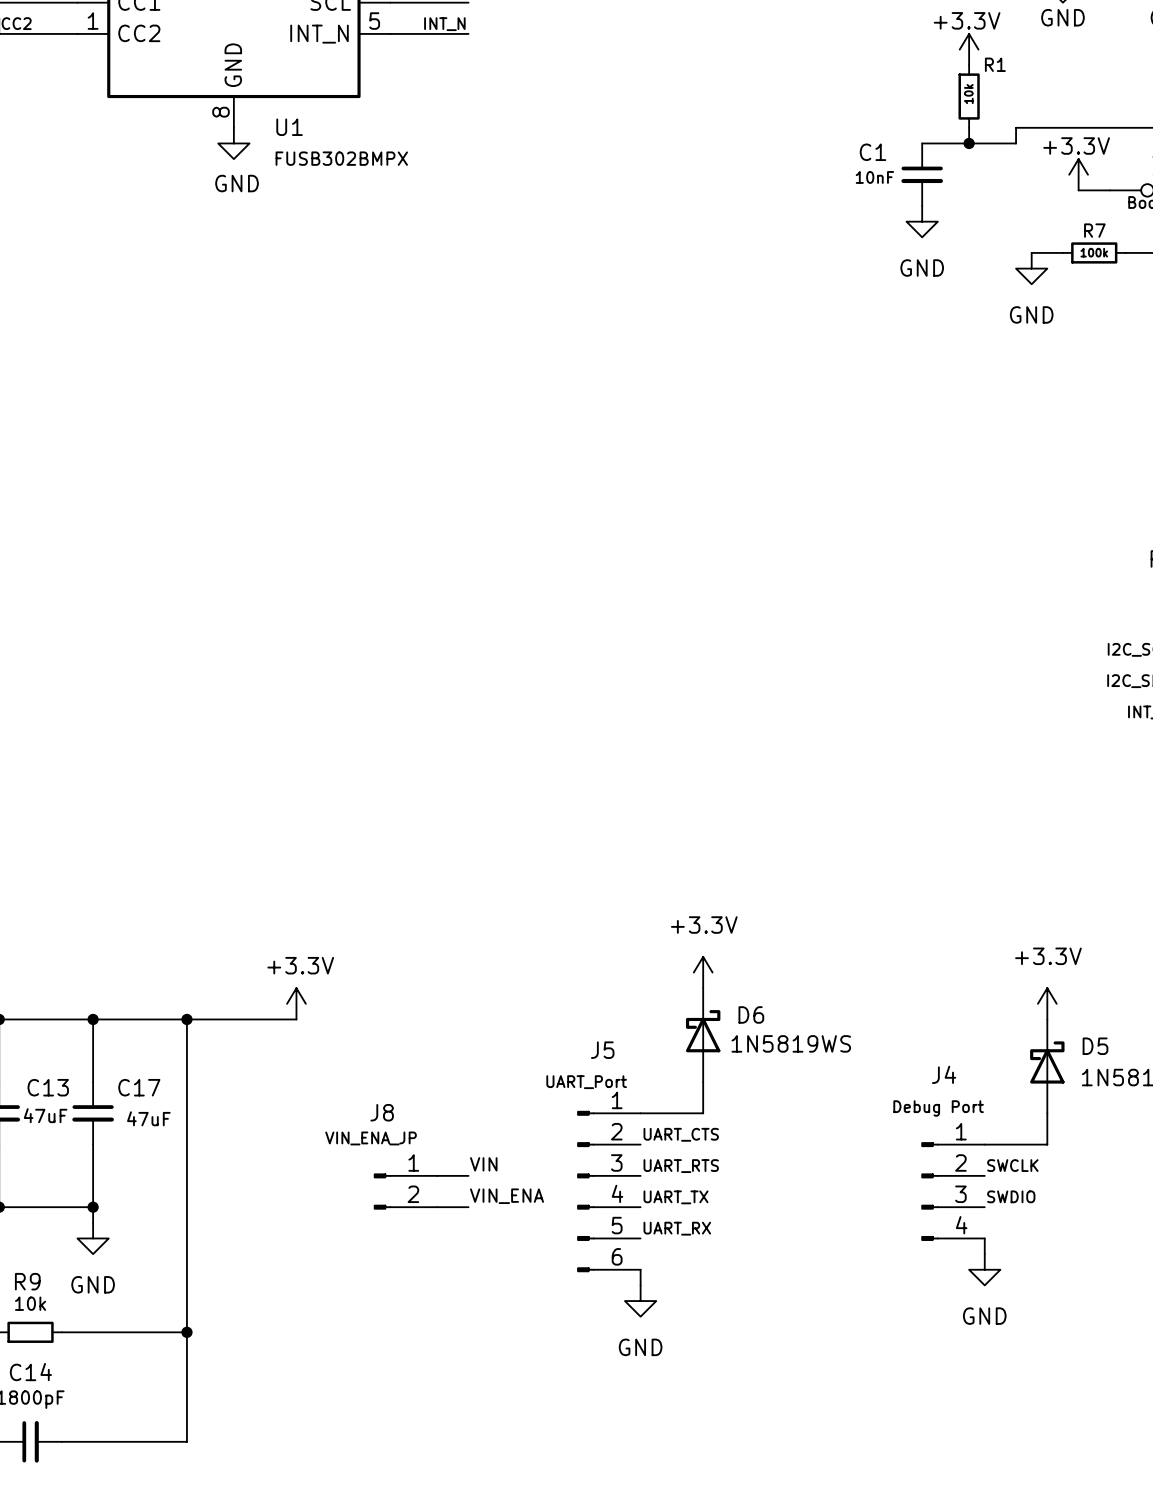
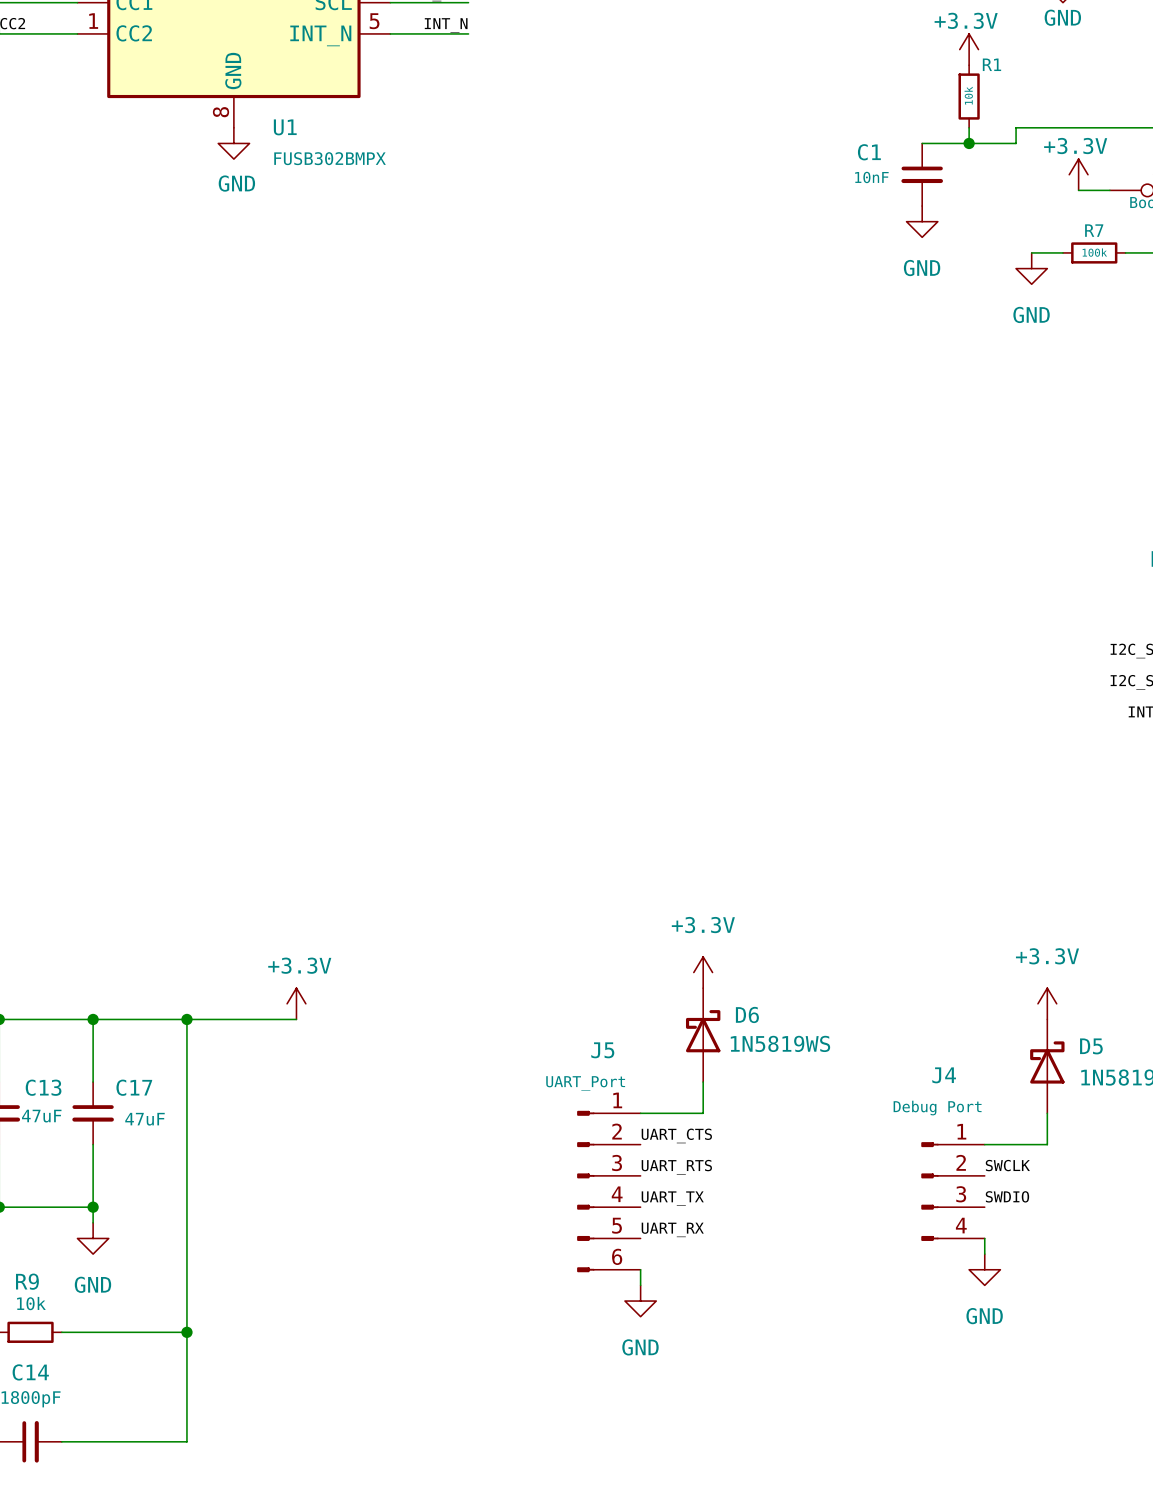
label: VIN (483, 1164) -> none
wire: (437, 1175) (468, 1175) -> none
J8: VIN_ENA_JP (405, 1191) -> none
label: VIN_ENA (507, 1196) -> none
wire: (437, 1207) (468, 1207) -> none

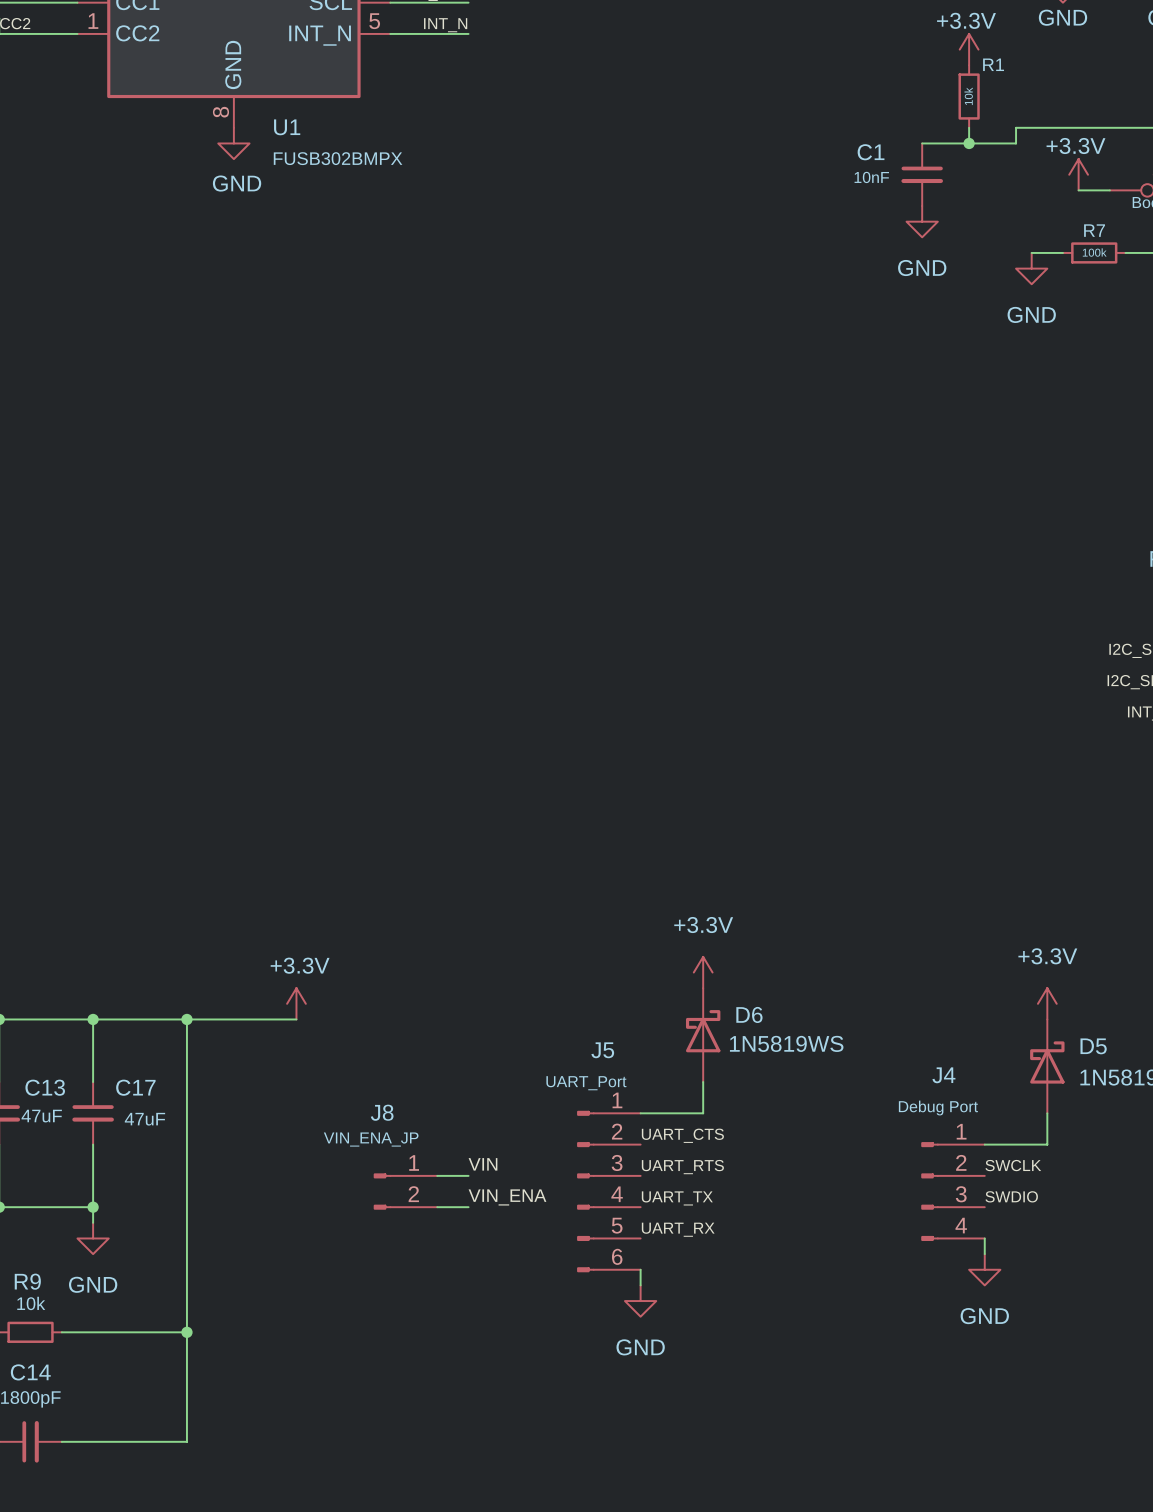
label: none -> VIN (483, 1164)
wire: none -> (437, 1175) (468, 1175)
J8: none -> VIN_ENA_JP (405, 1191)
label: none -> VIN_ENA (507, 1197)
wire: none -> (437, 1207) (468, 1207)

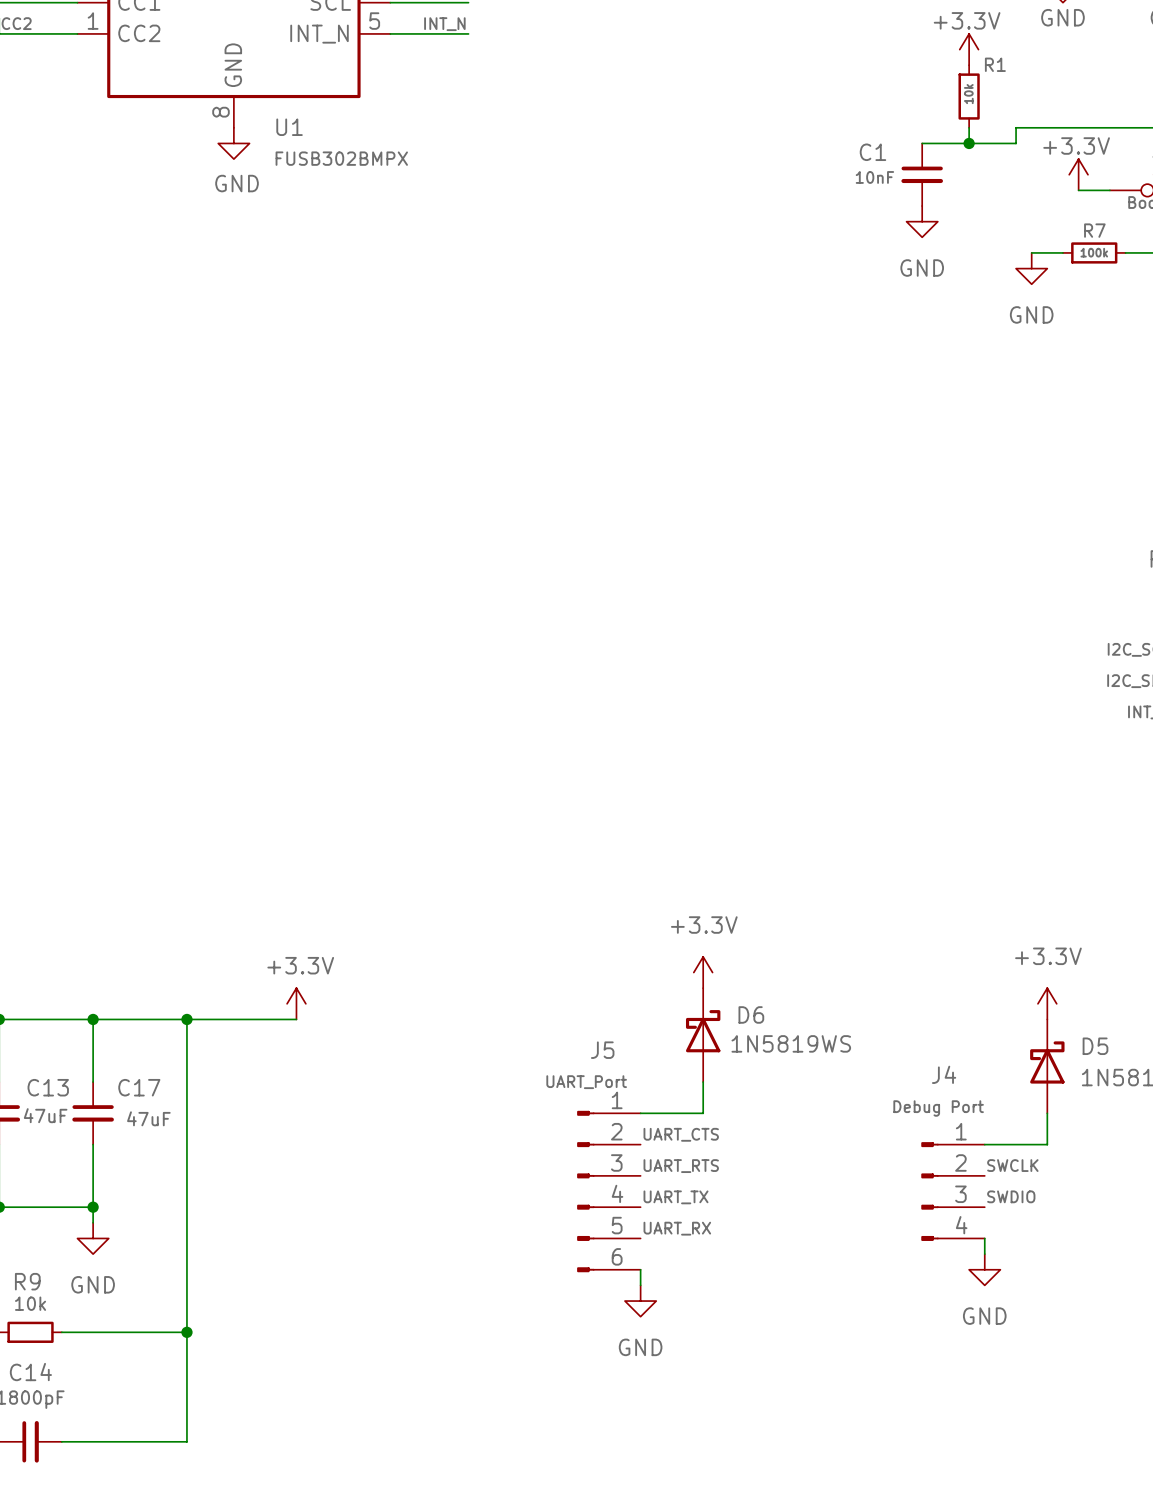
label: VIN (483, 1164) -> none
wire: (437, 1175) (468, 1175) -> none
J8: VIN_ENA_JP (405, 1191) -> none
label: VIN_ENA (507, 1197) -> none
wire: (437, 1207) (468, 1207) -> none

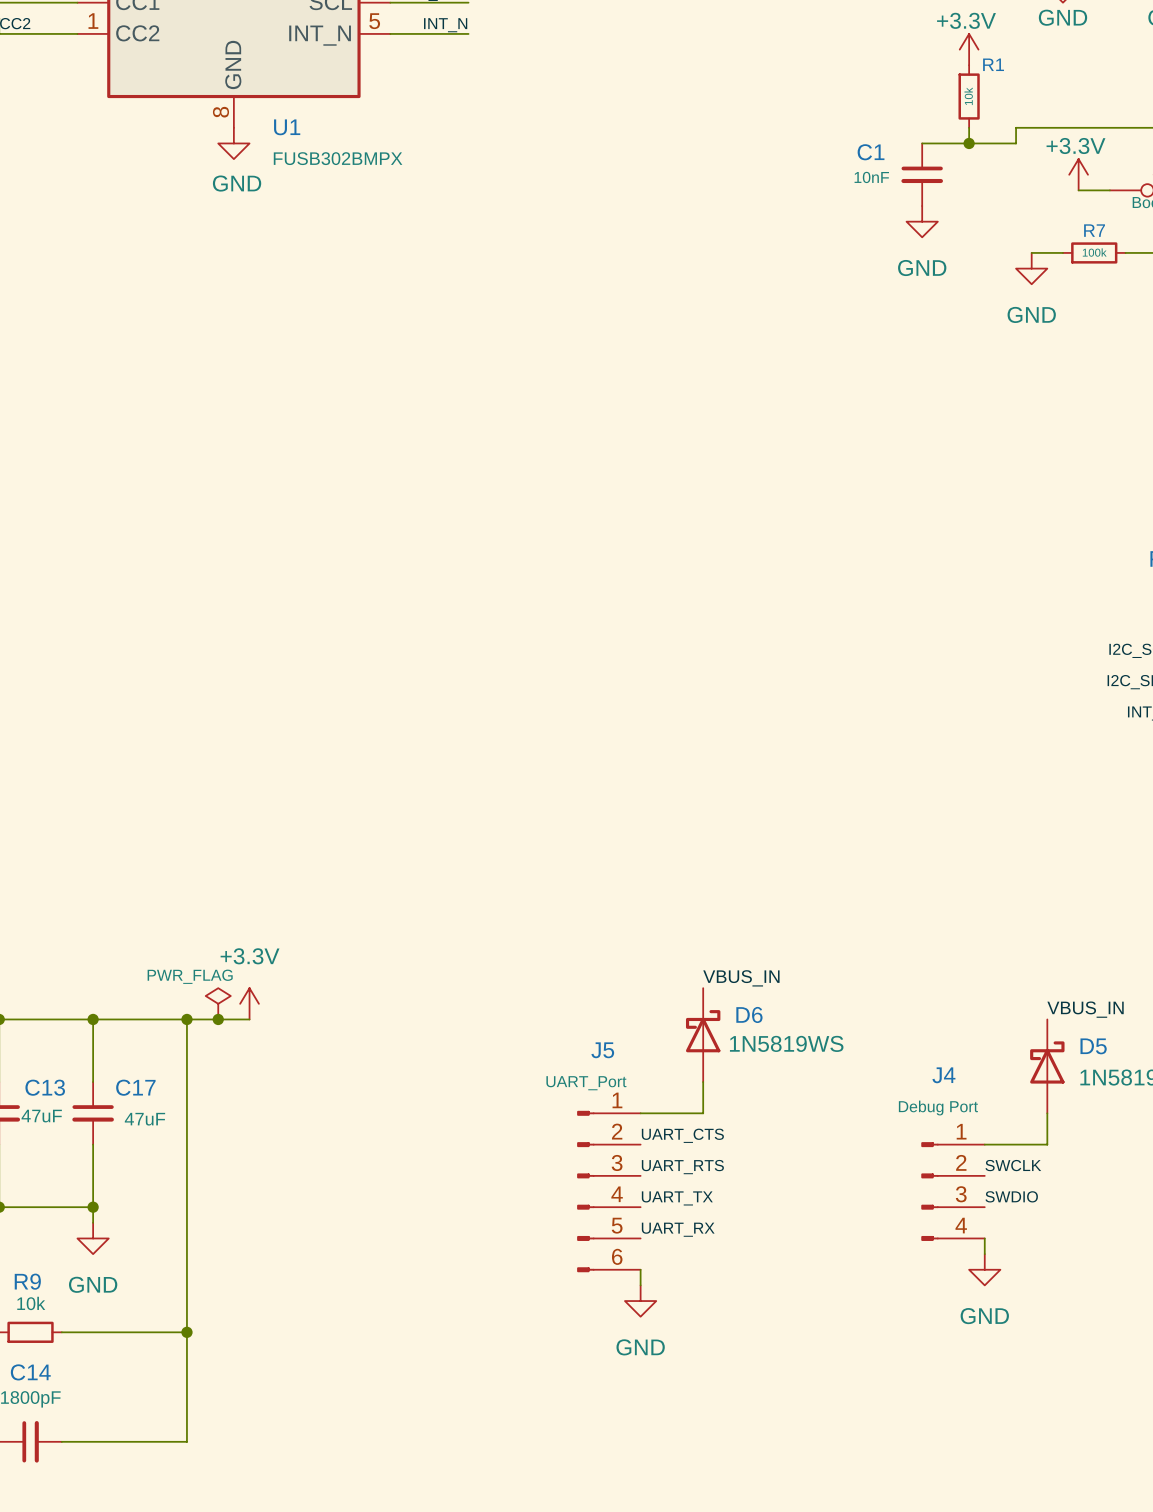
power symbol text position: +3.3V (300, 965) -> +3.3V (250, 956)
power symbol: +3.3V (703, 972) -> none
label: none -> VBUS_IN (741, 978)
power symbol: none -> PWR_FLAG (218, 1003)
power symbol position: +3.3V (296, 1003) -> +3.3V (249, 1003)
power symbol: +3.3V (1047, 1003) -> none
label: none -> VBUS_IN (1085, 1009)
junction: none -> (218, 1019)
wire: (249, 1019) (296, 1019) -> none

